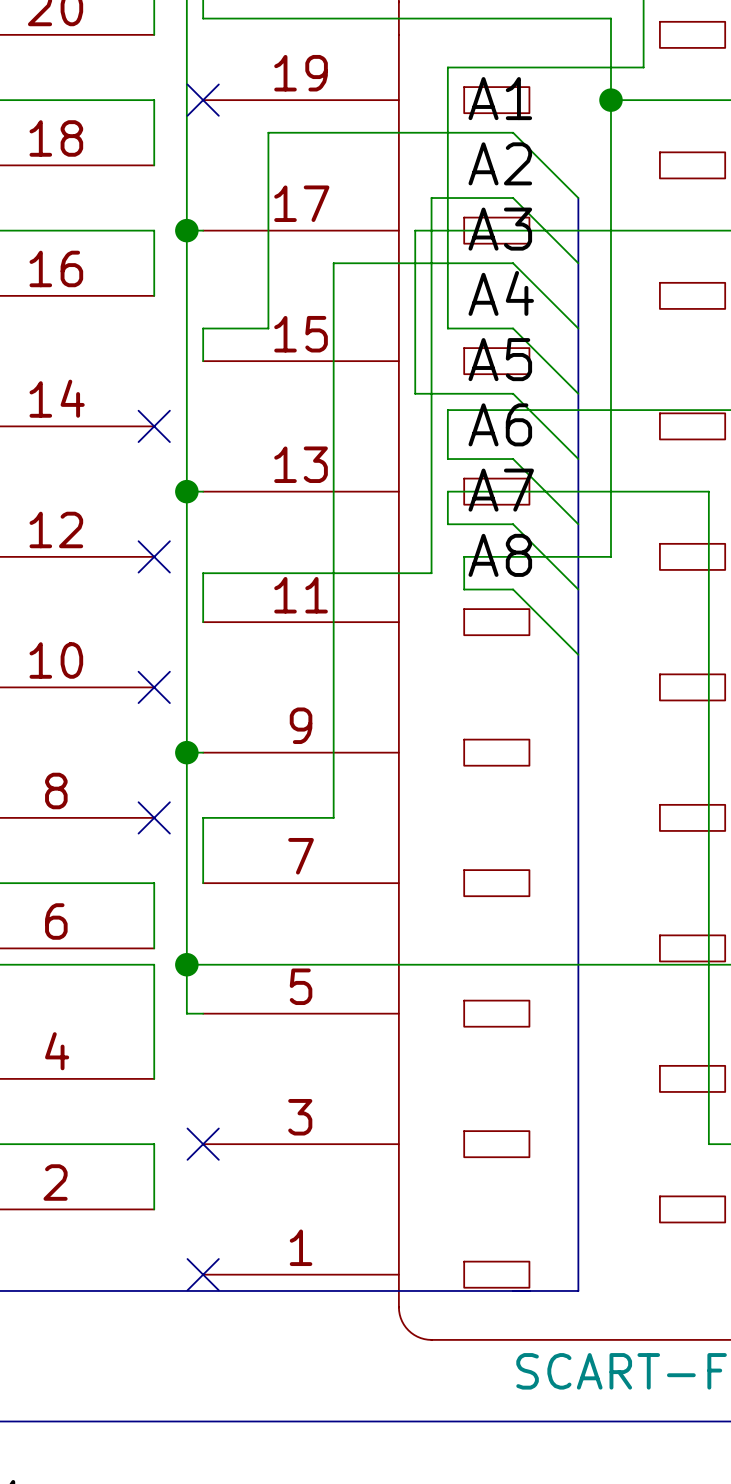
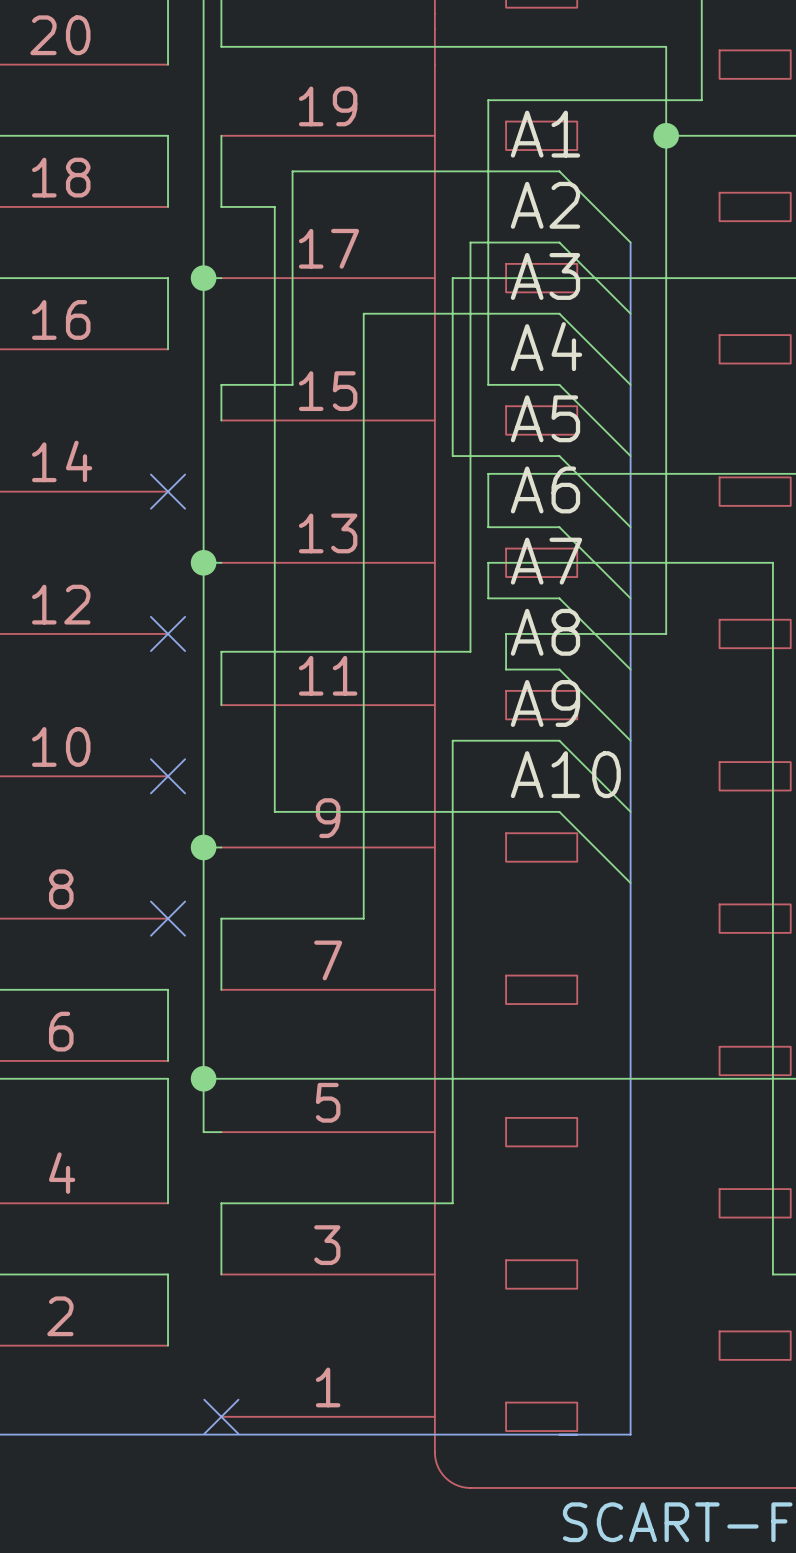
wire: none -> (221, 135) (221, 206) (274, 206) (274, 811) (559, 811) (630, 883)
no-connect mark: (203, 100) -> none
label: none -> A9 (545, 703)
label: none -> A10 (565, 774)
wire: none -> (630, 811) (559, 740) (452, 740) (452, 1203) (221, 1203) (221, 1274)
no-connect mark: (203, 1144) -> none

